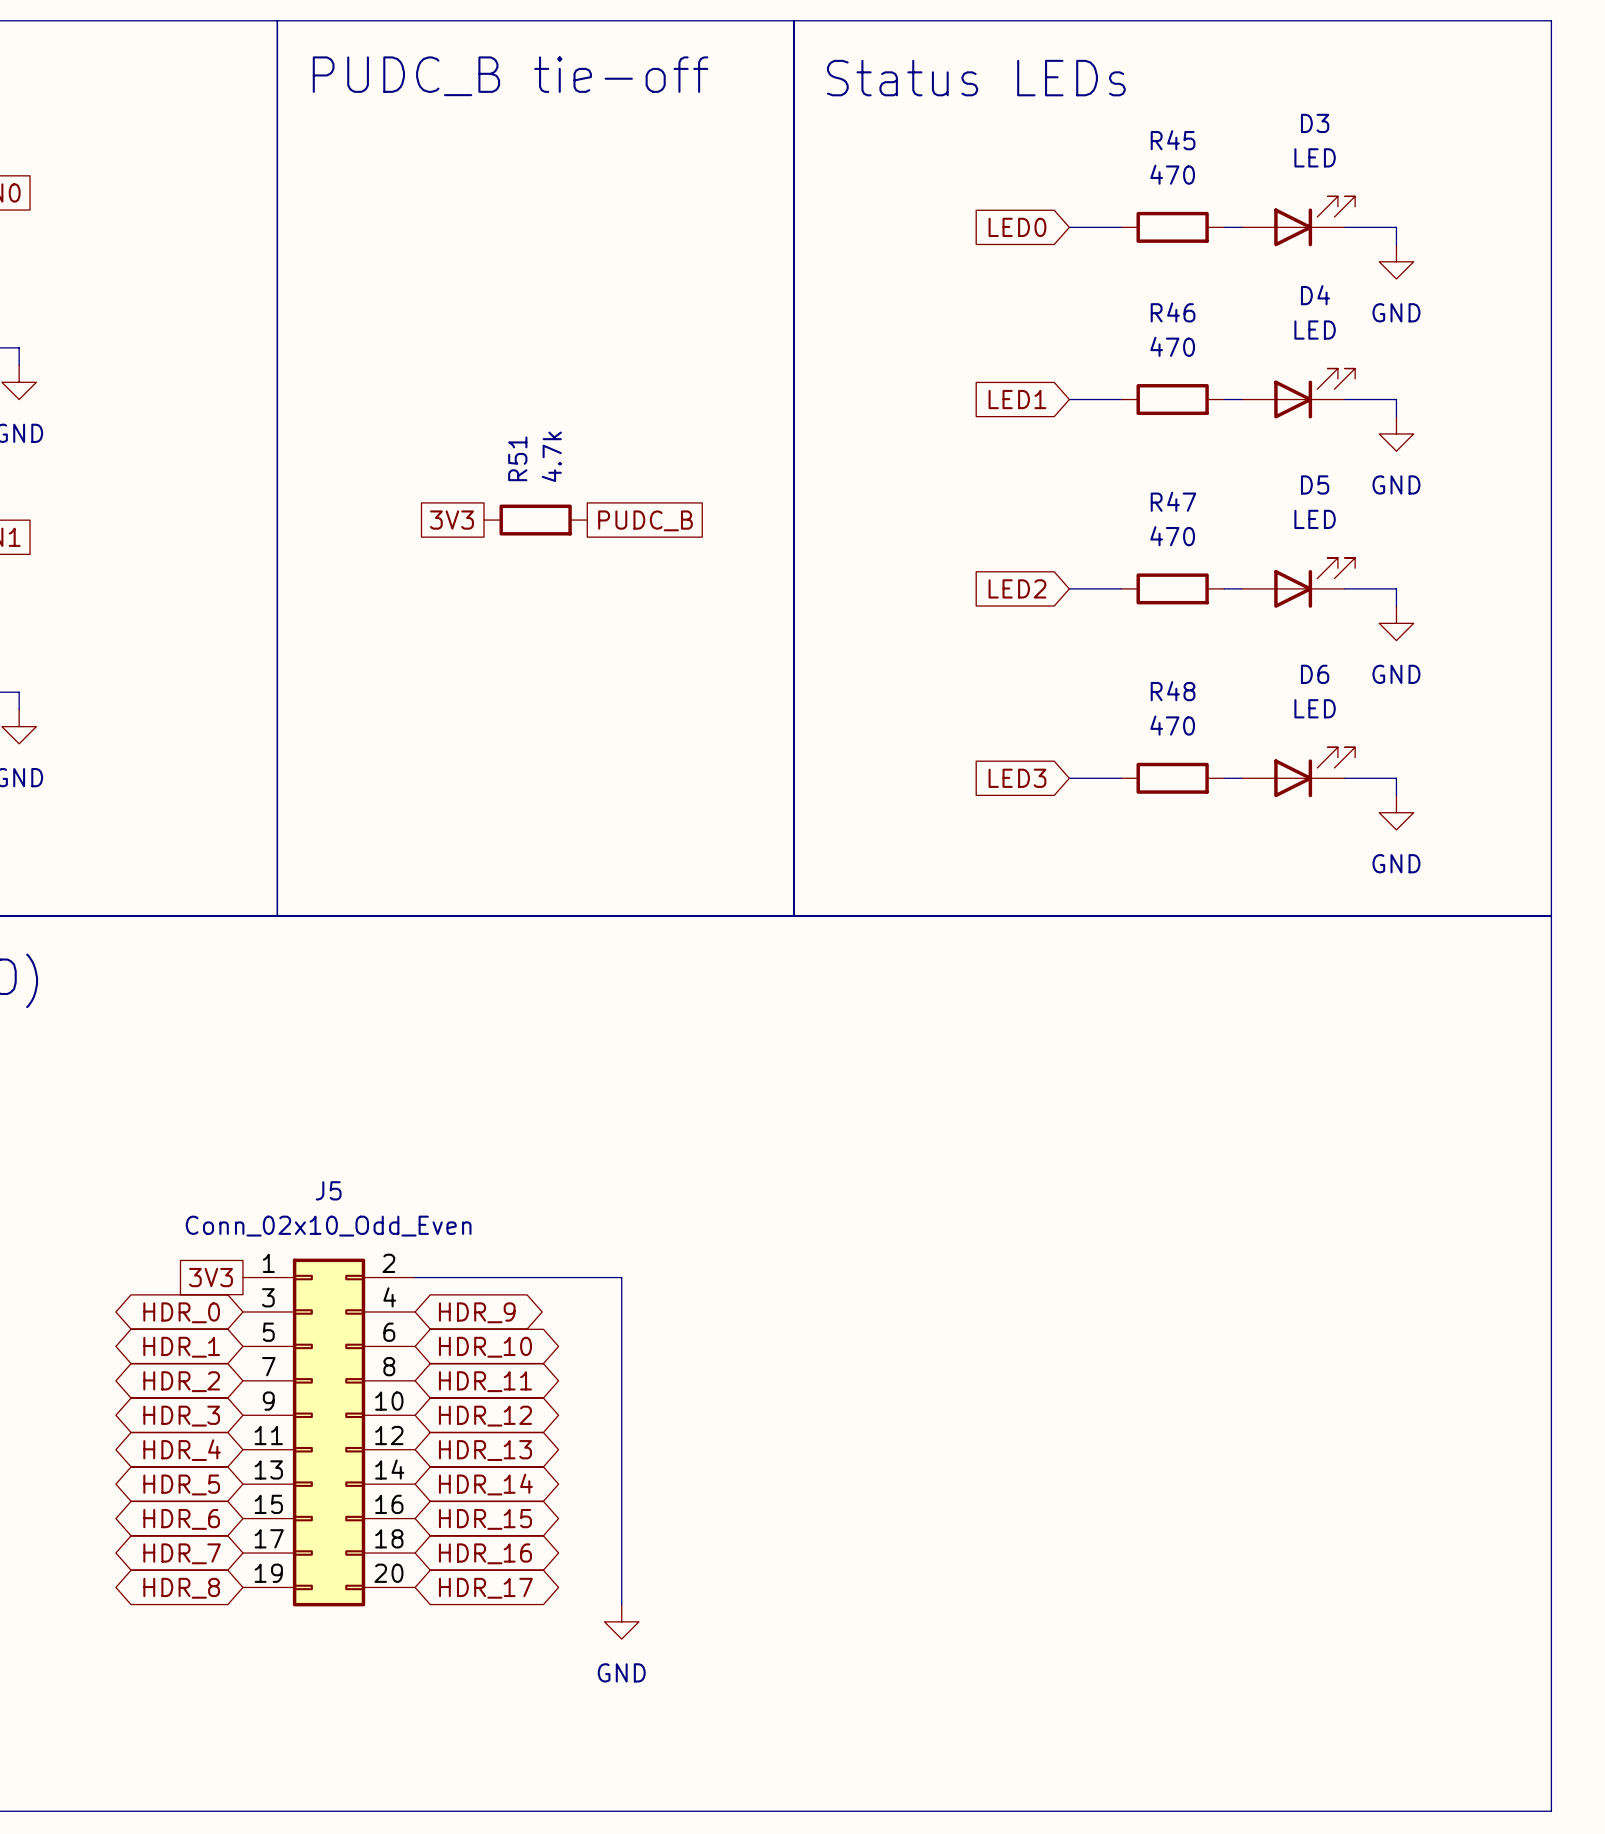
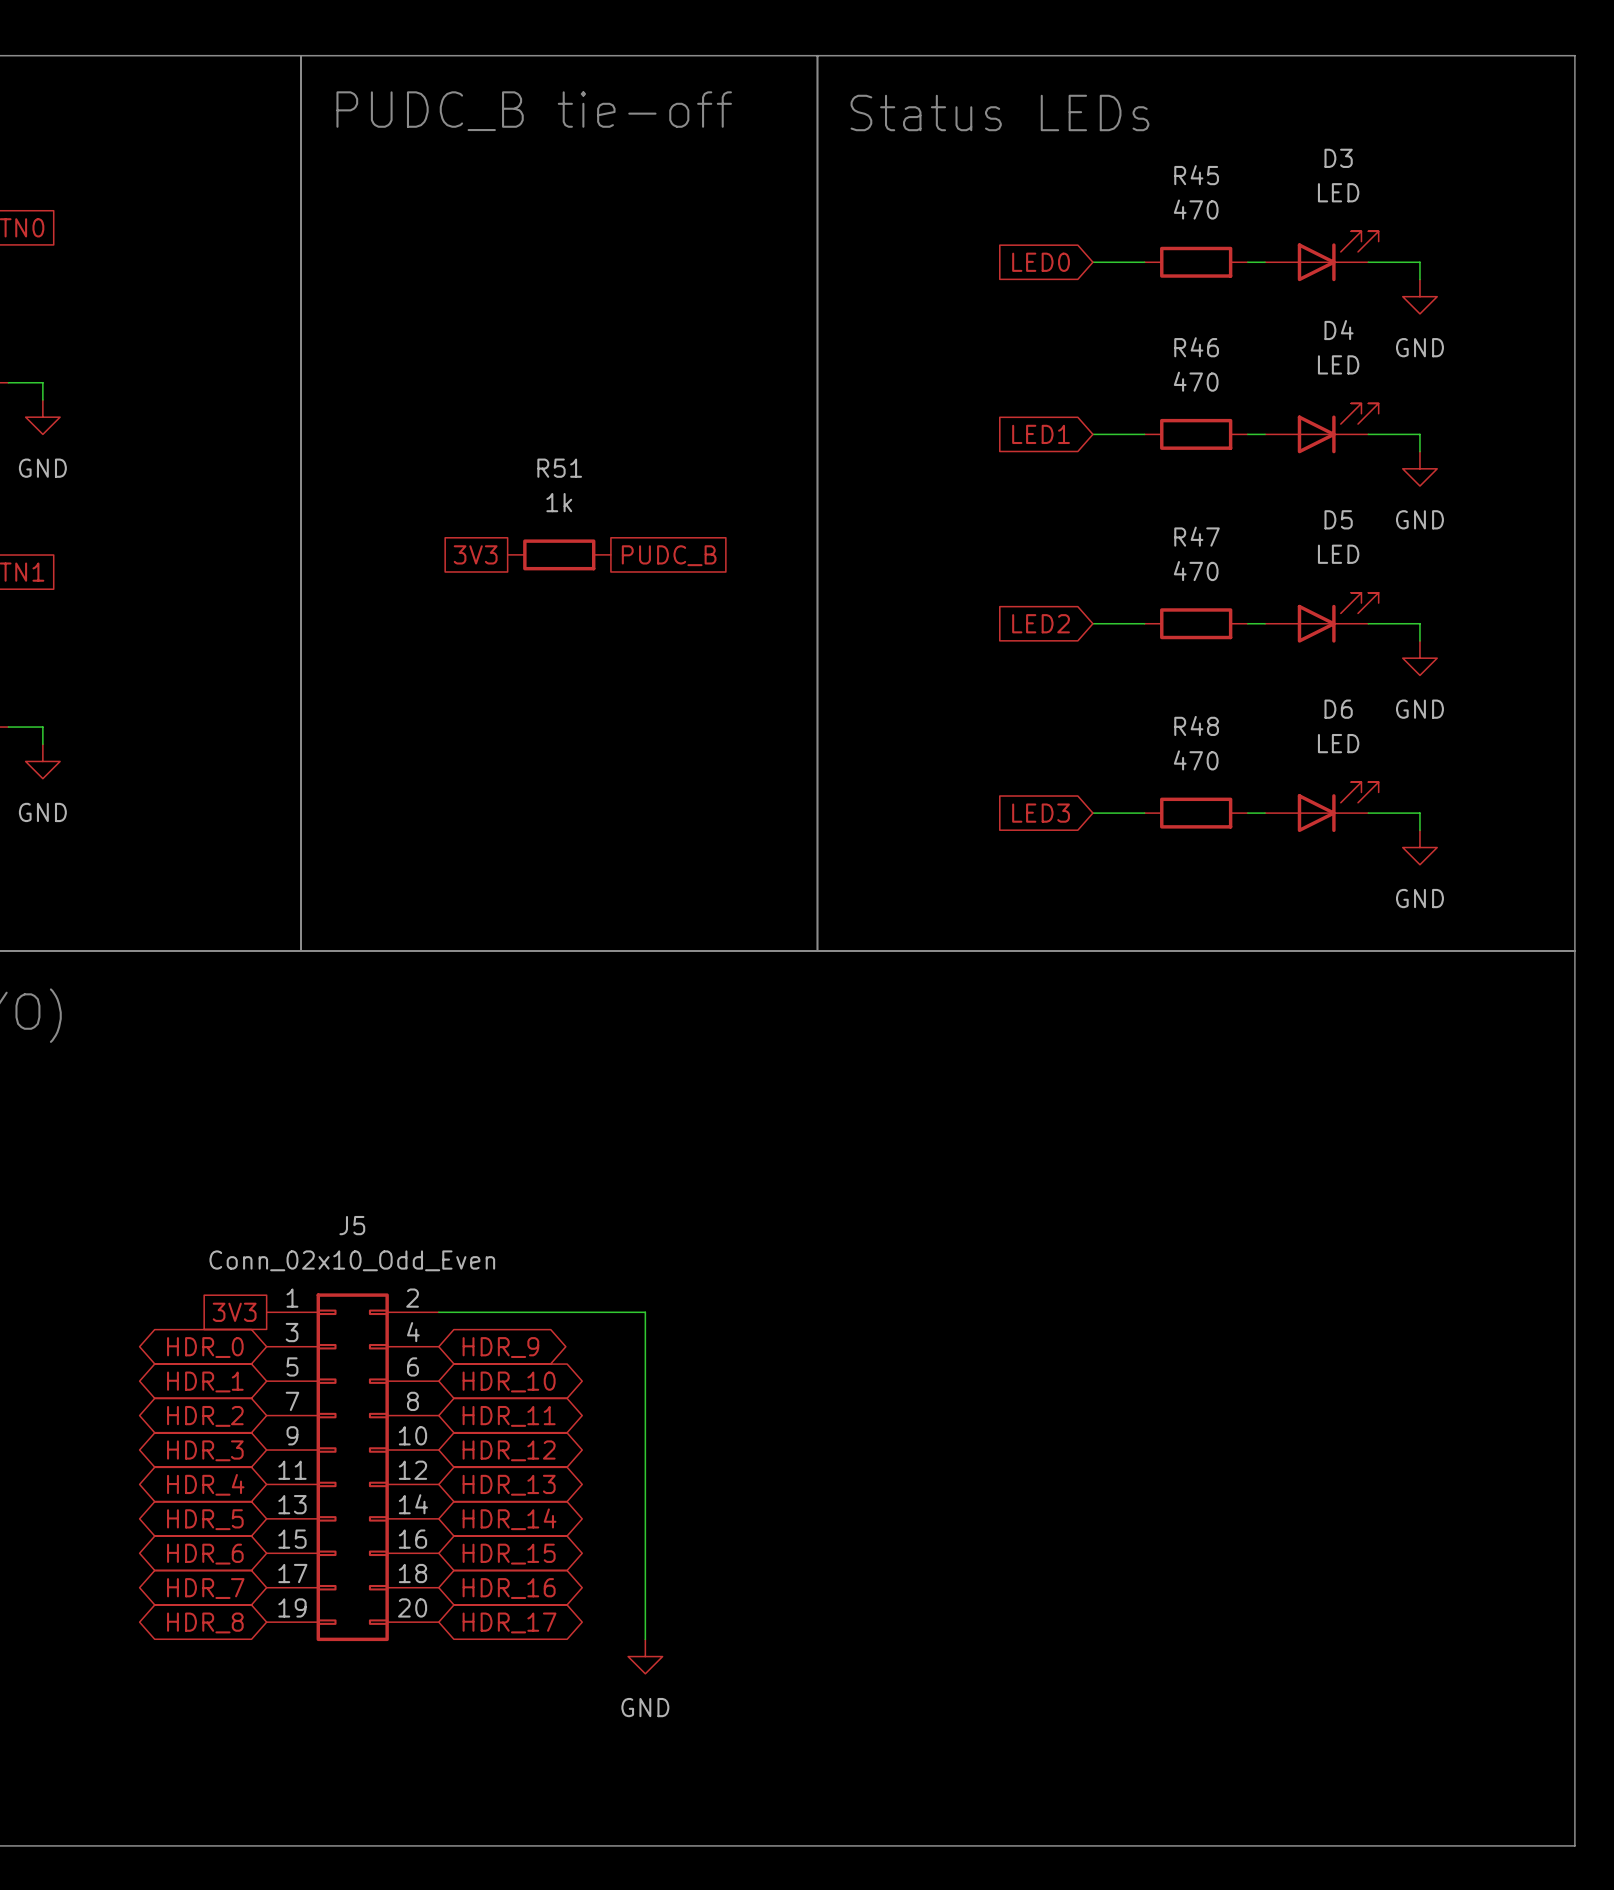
R51 value: 4.7k (551, 456) -> 1k (559, 502)
R51 name rotation: 0° (517, 458) -> 90° clockwise (559, 468)

